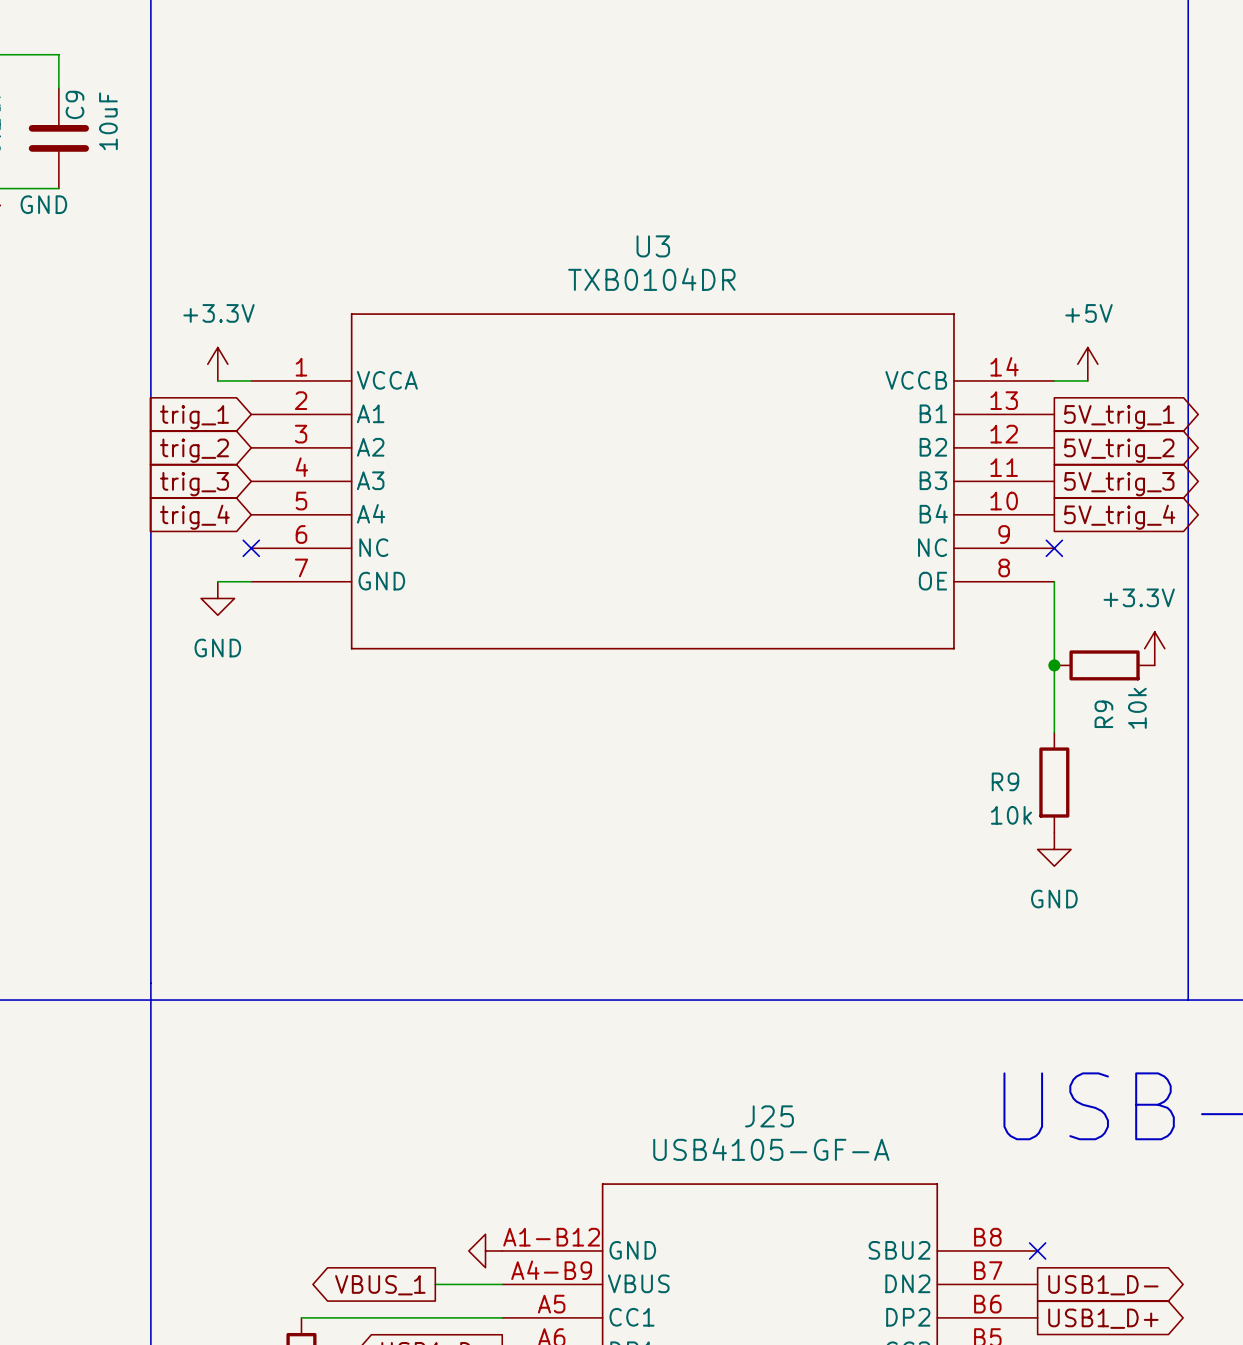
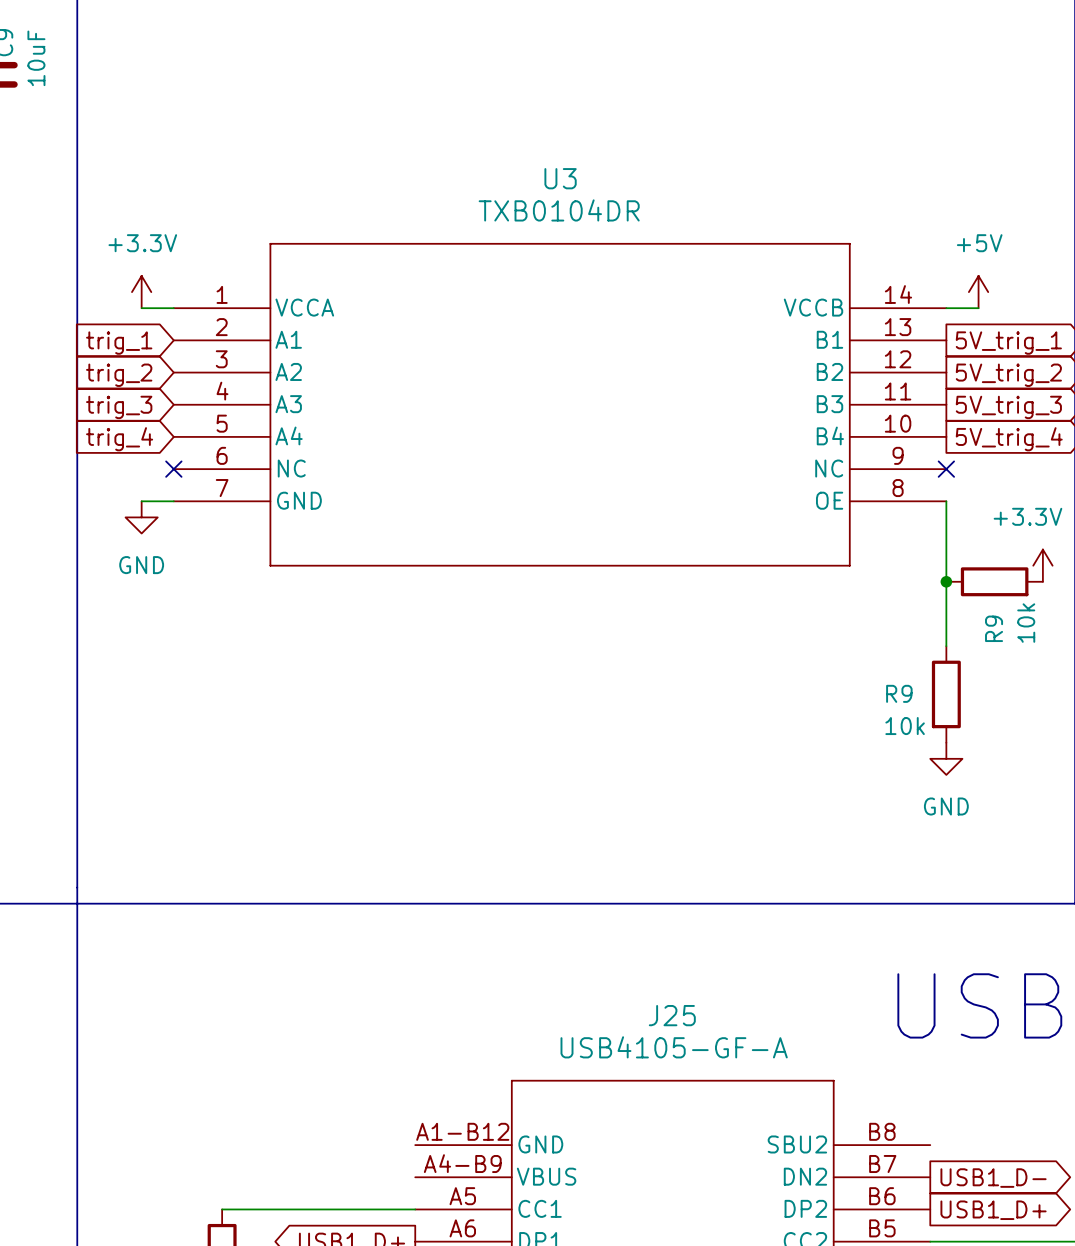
power symbol: (485, 1250) -> none
no-connect mark: (1037, 1250) -> none
wire: (435, 1284) (502, 1284) -> none
global label: VBUS_1 (380, 1285) -> none

